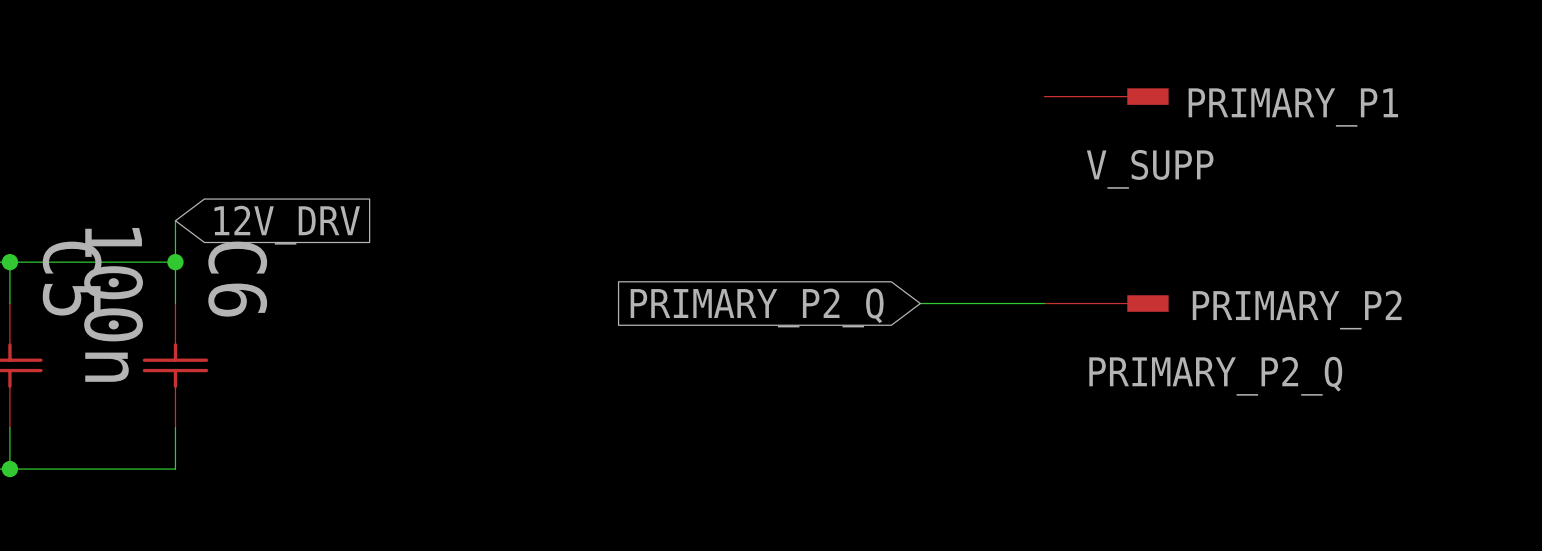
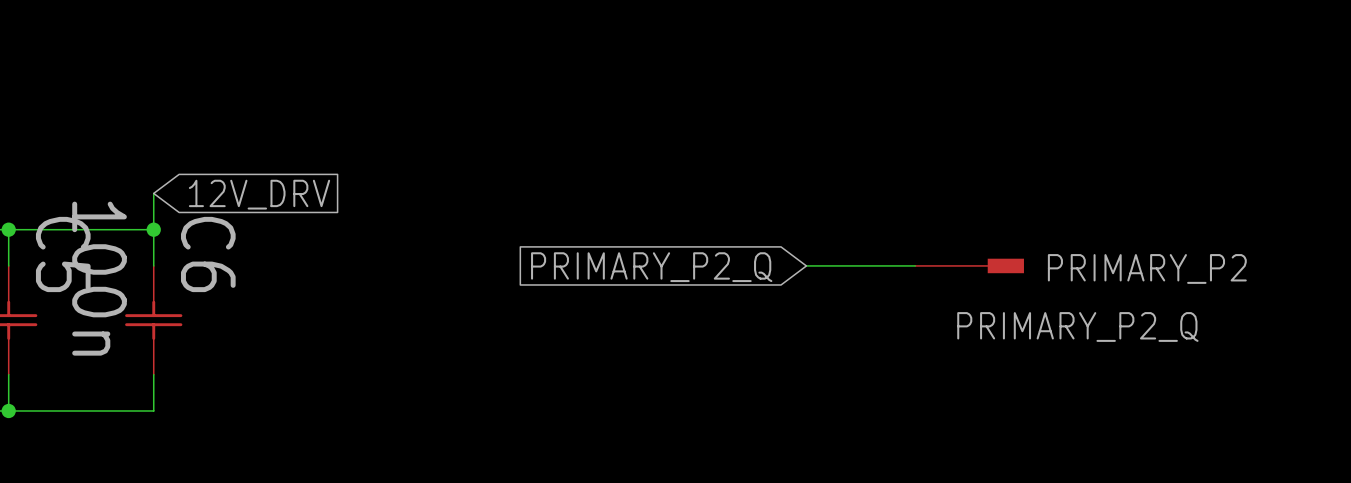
PRIMARY_P1: V_SUPP (1106, 96) -> none

